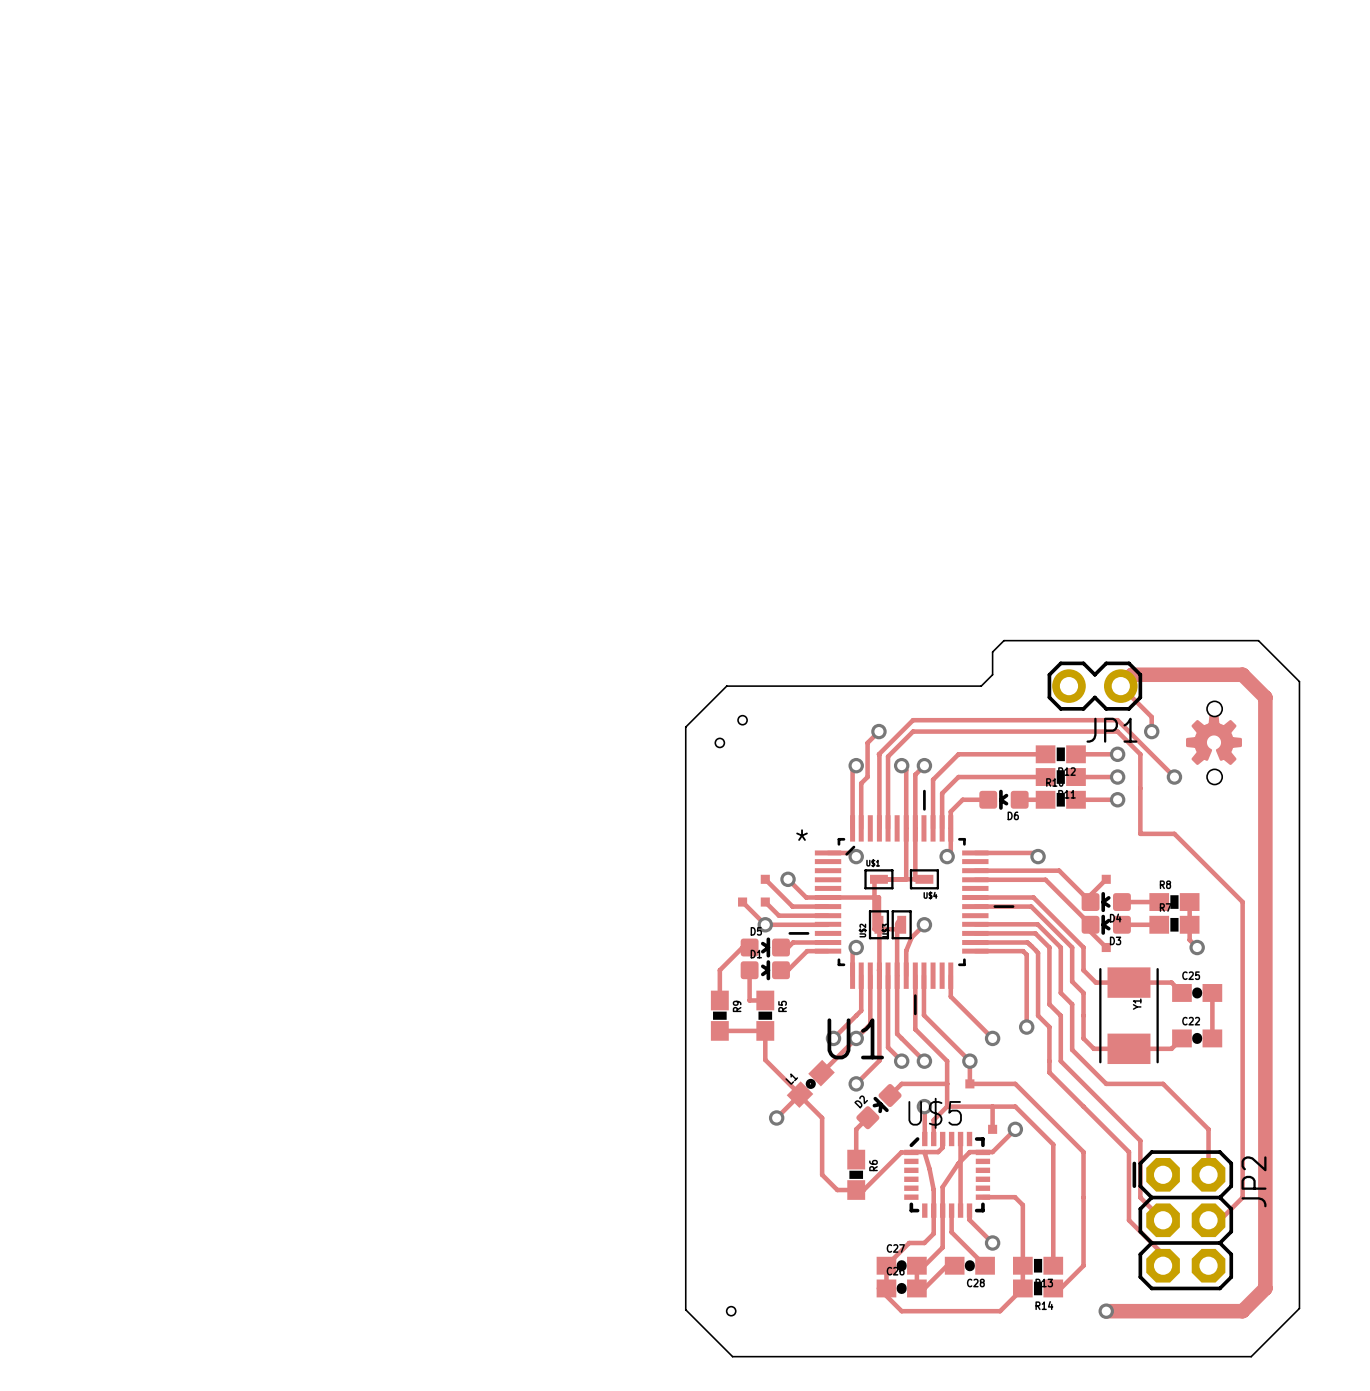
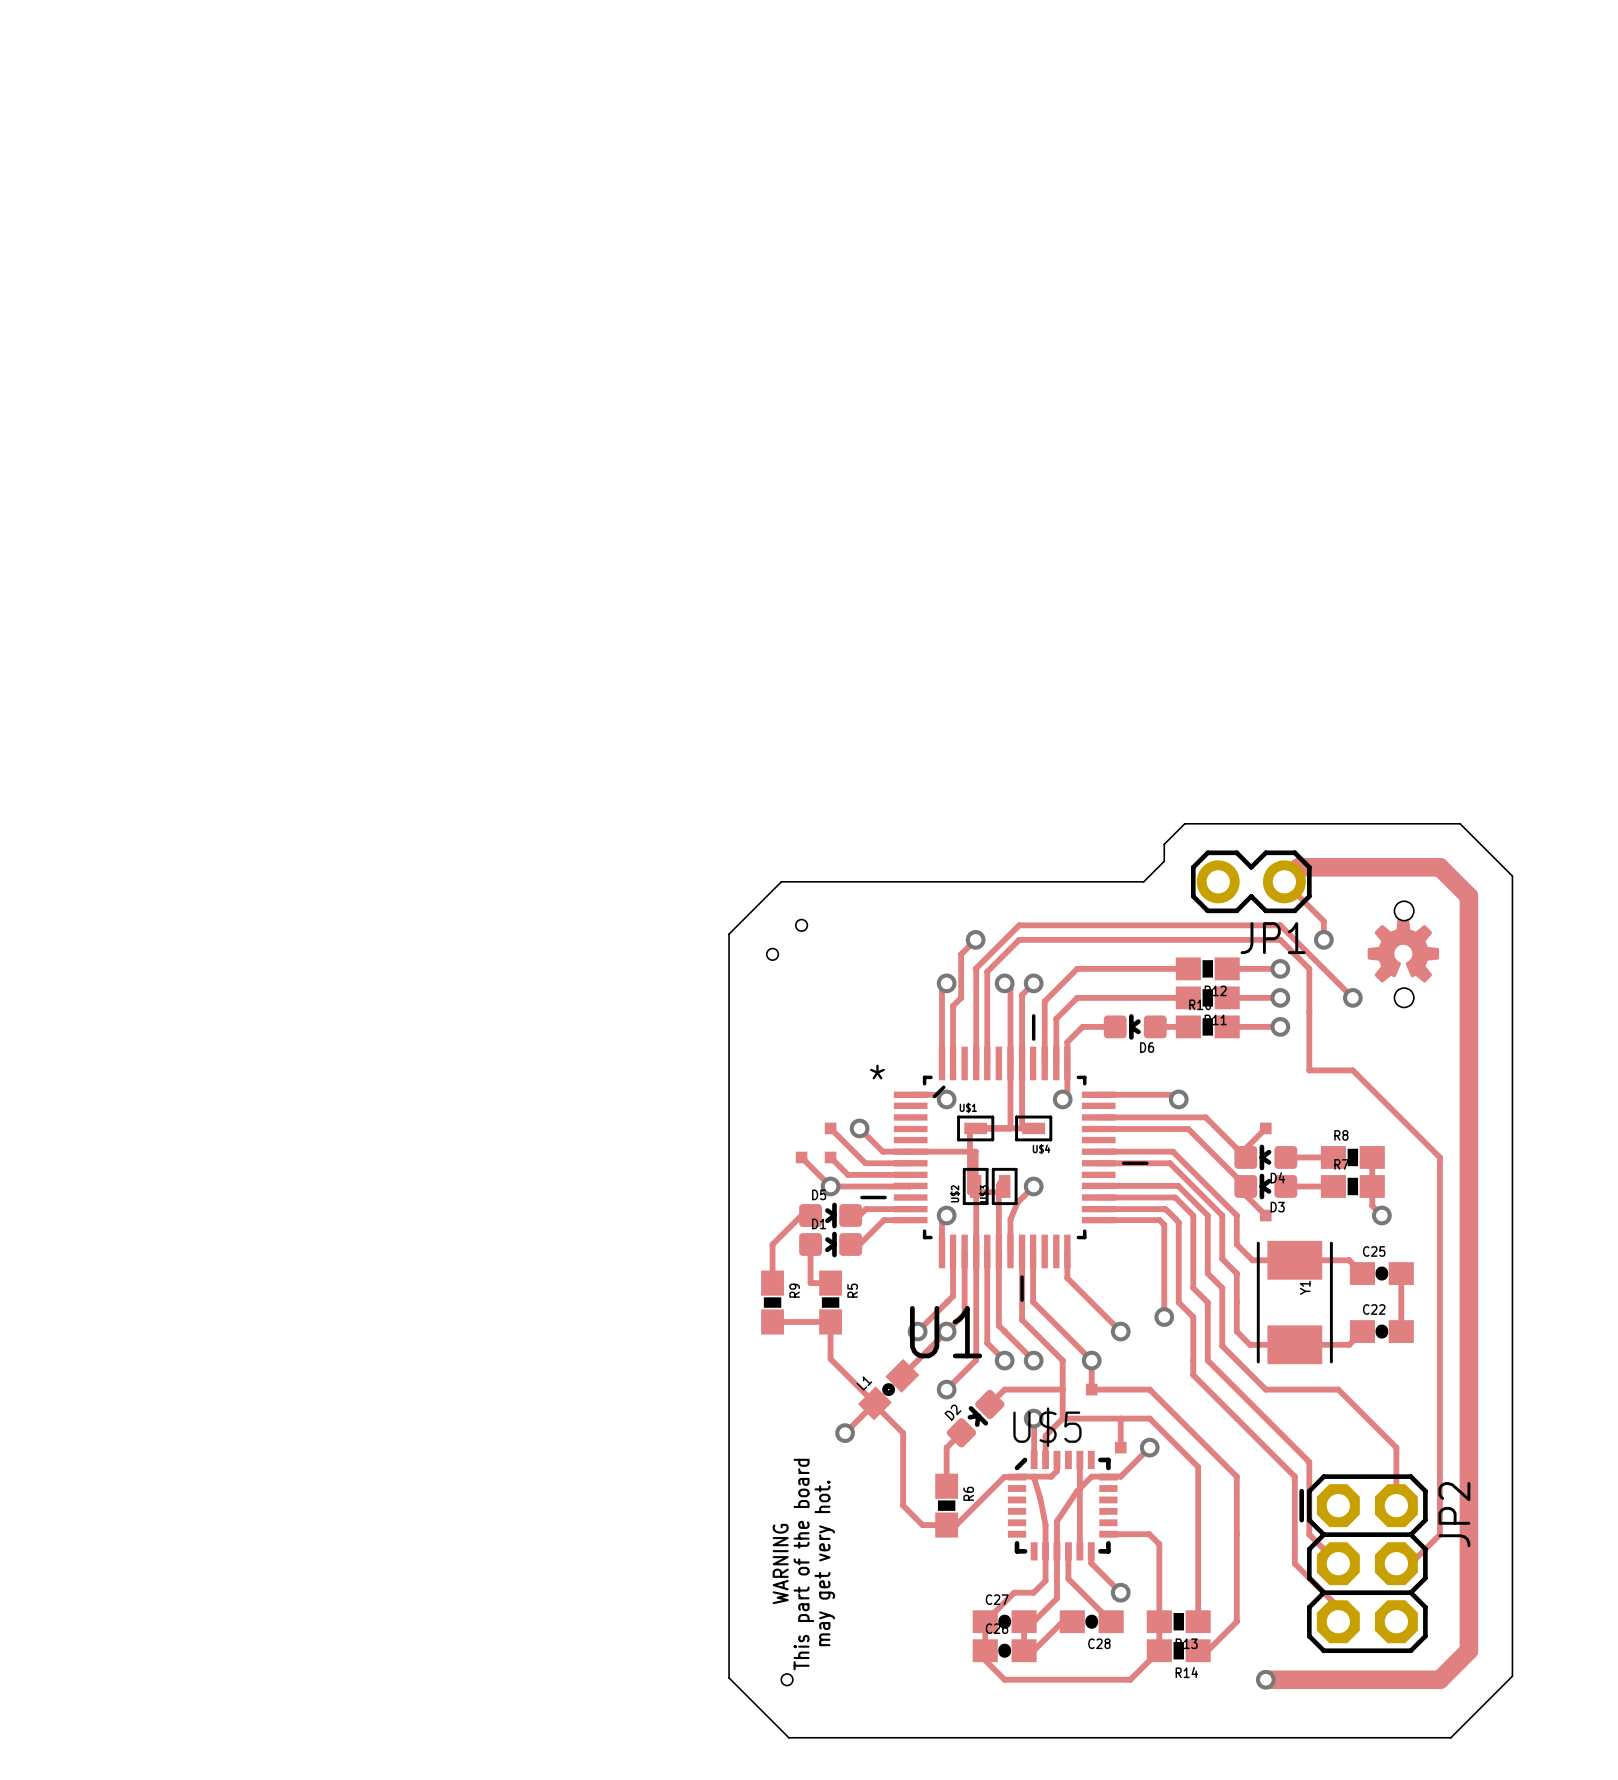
board edge: (1042, 640) (1003, 640) (992, 652) (992, 674) (981, 686) -> (1184, 823) (1164, 844) (1164, 861) (1143, 881) (1106, 881)
text: none -> WARNING (780, 1563)
text: none -> This part of the board (803, 1564)
text: none -> may get very hot. (824, 1563)

